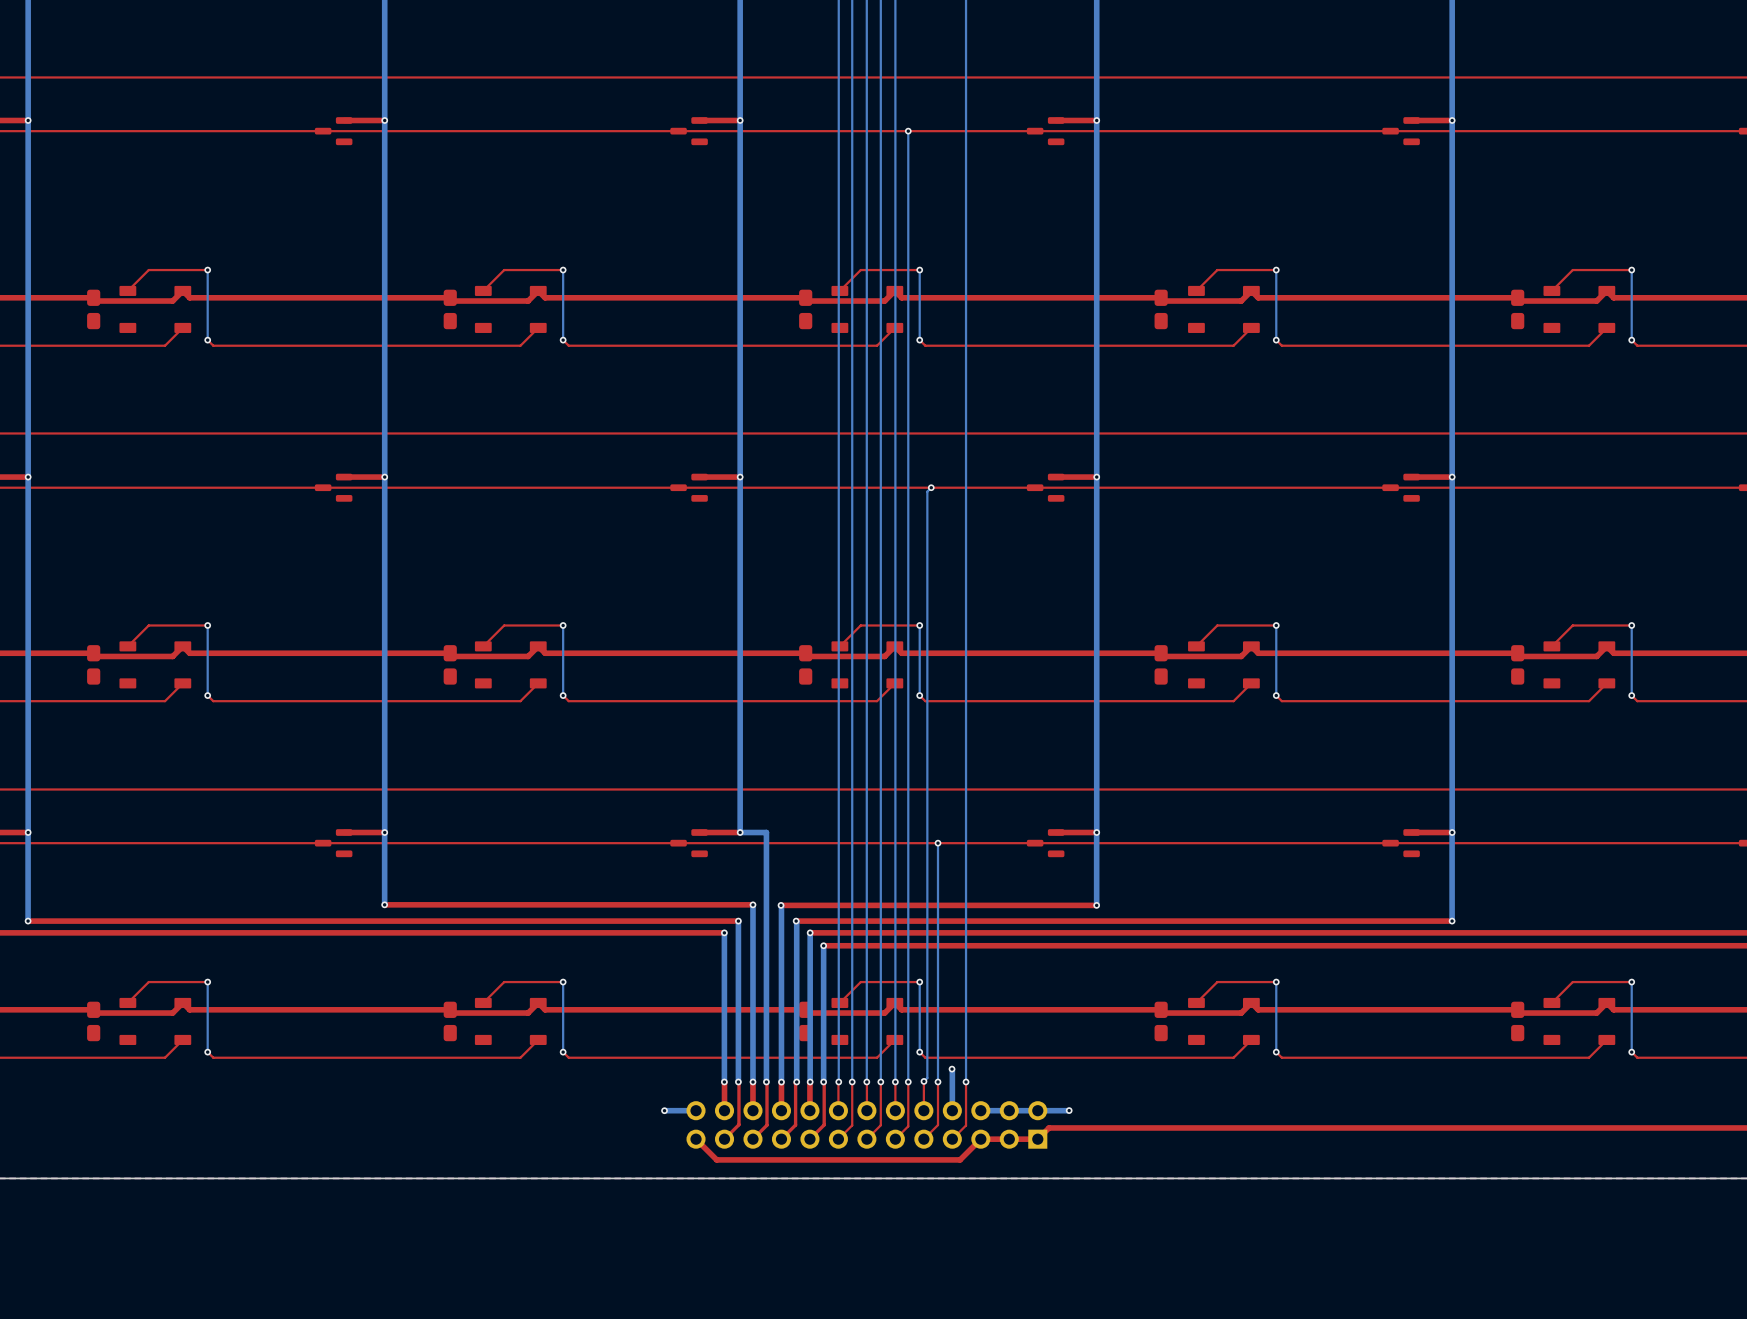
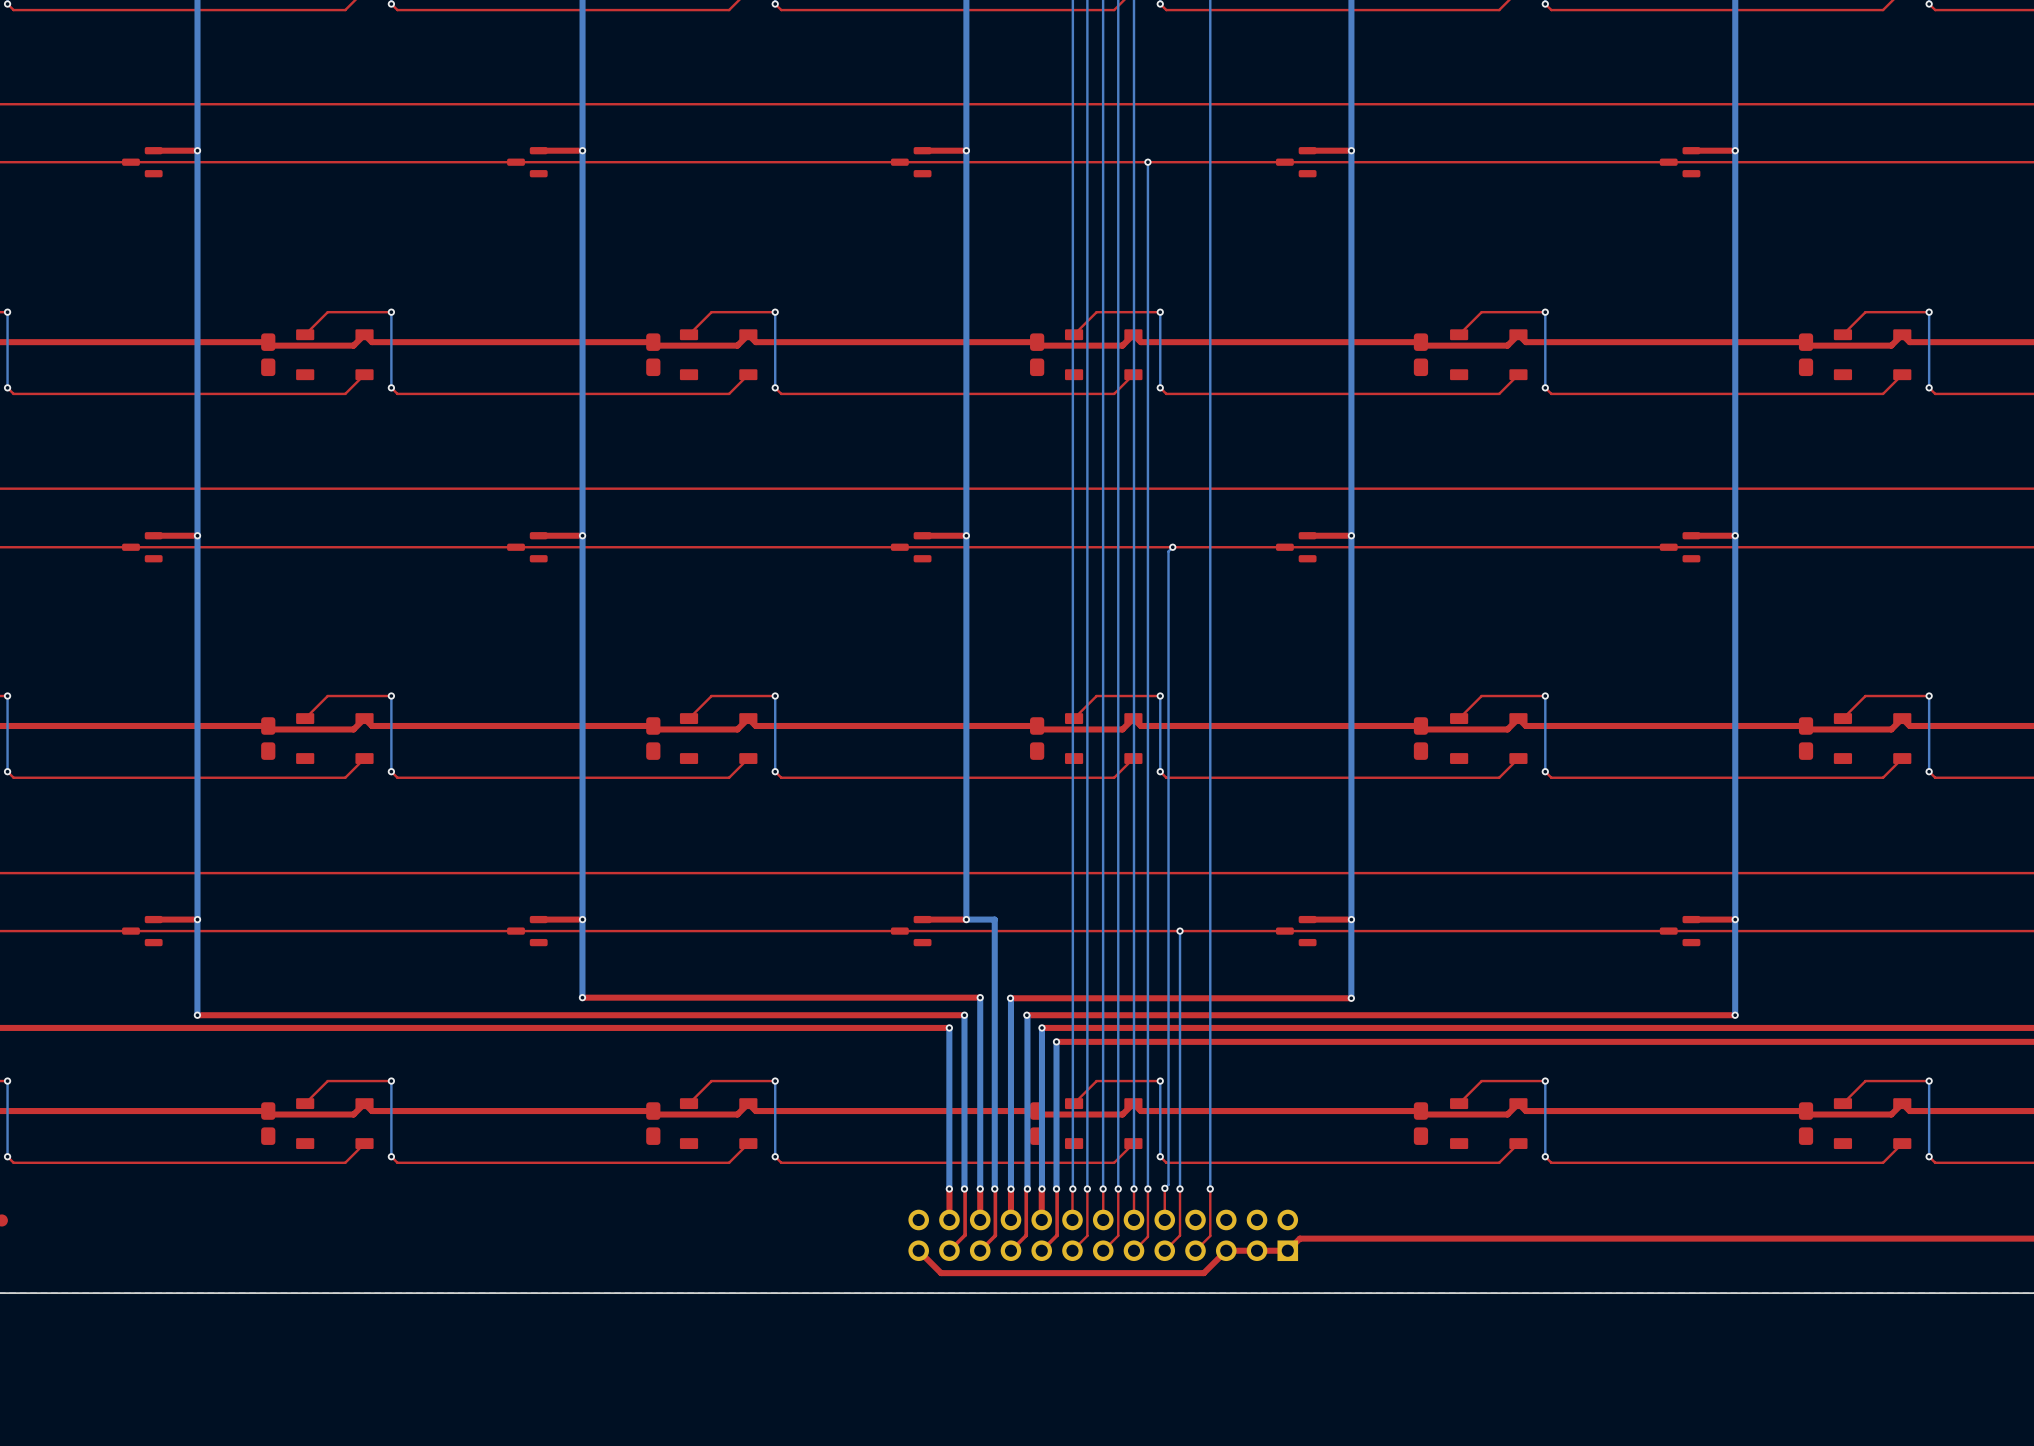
bottom track: (952, 1069) (952, 1110) -> none
via: (952, 1069) -> none
via: (664, 1110) -> none
bottom track: (696, 1110) (664, 1110) -> none
bottom track: (1069, 1110) (980, 1110) -> none
via: (1069, 1110) -> none

